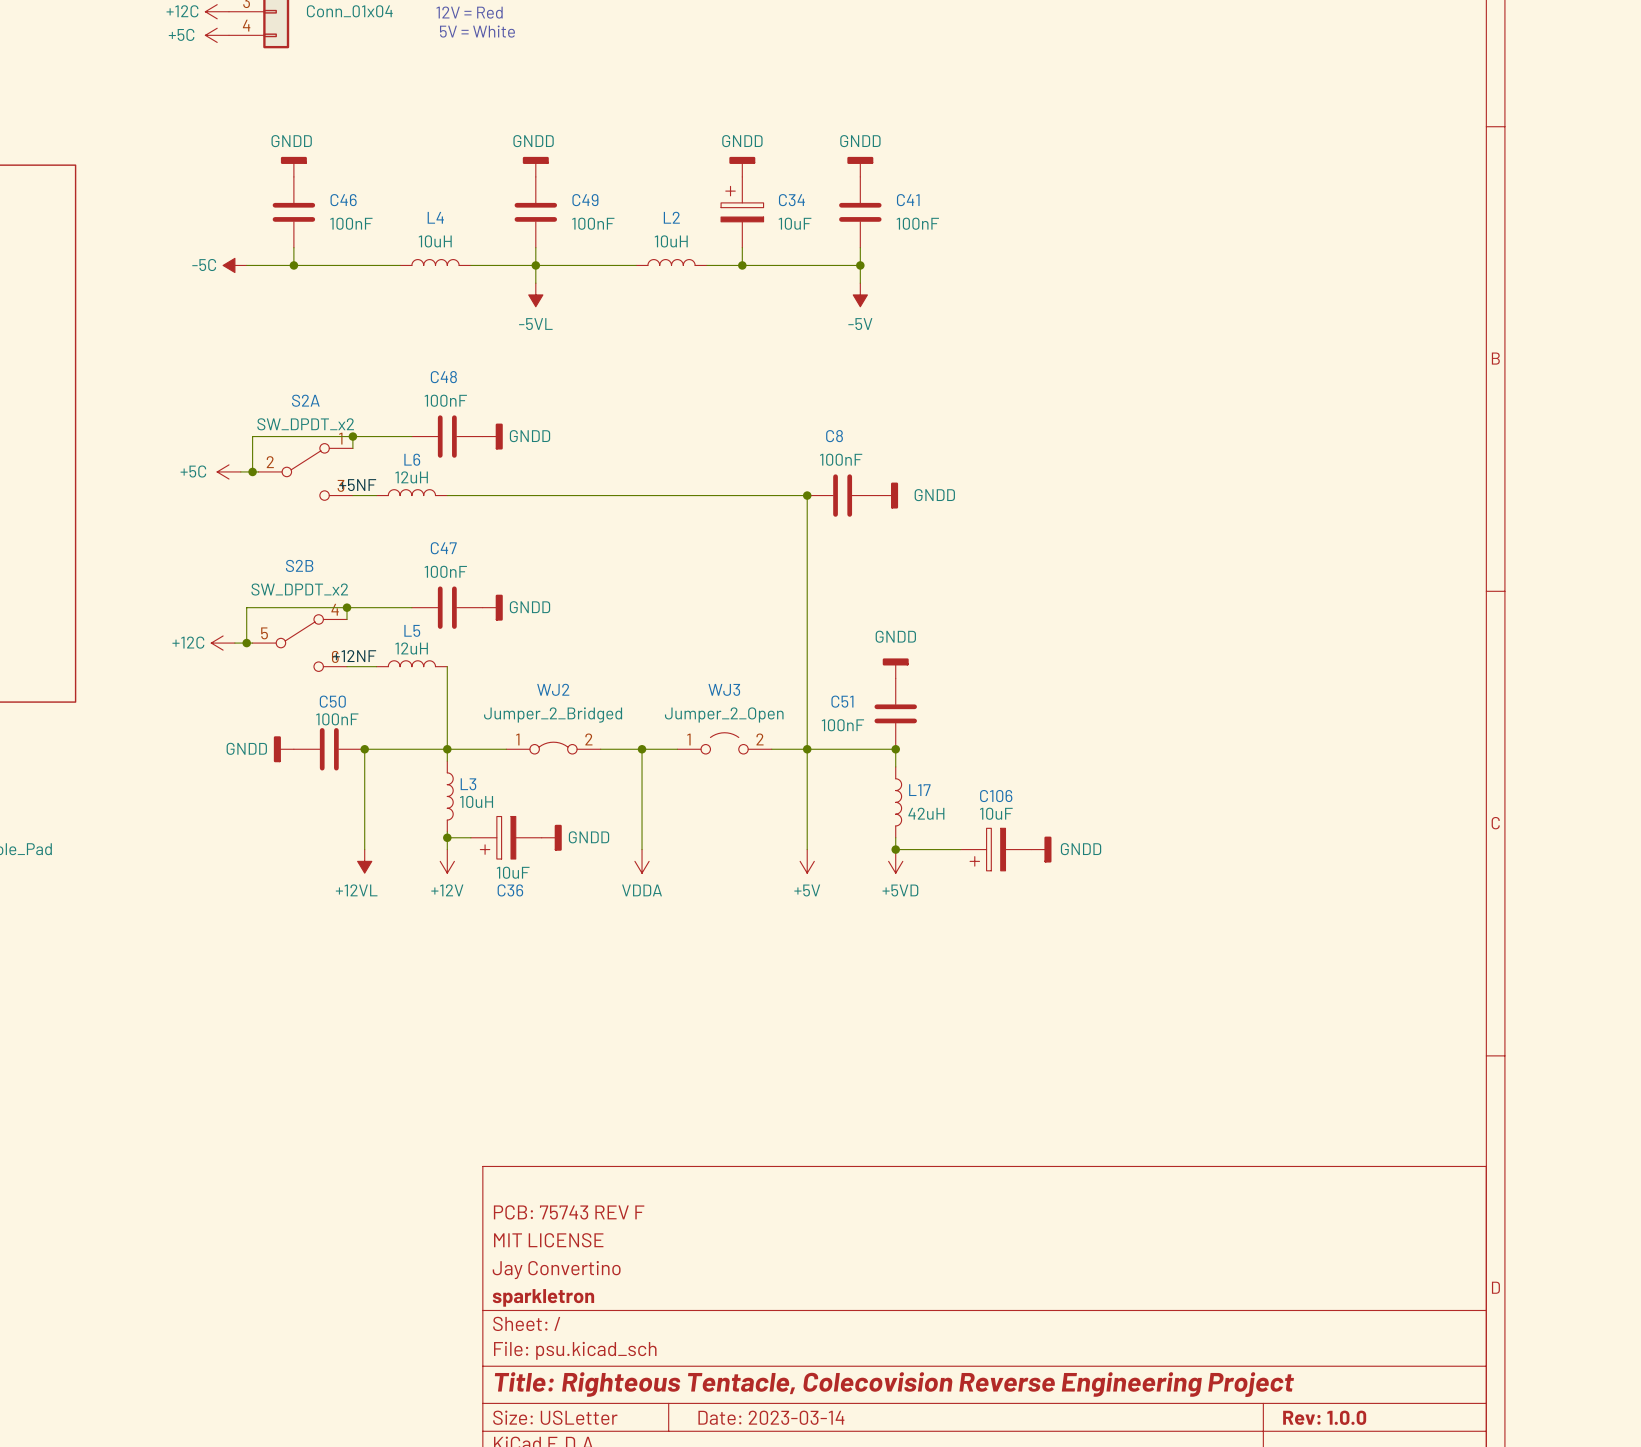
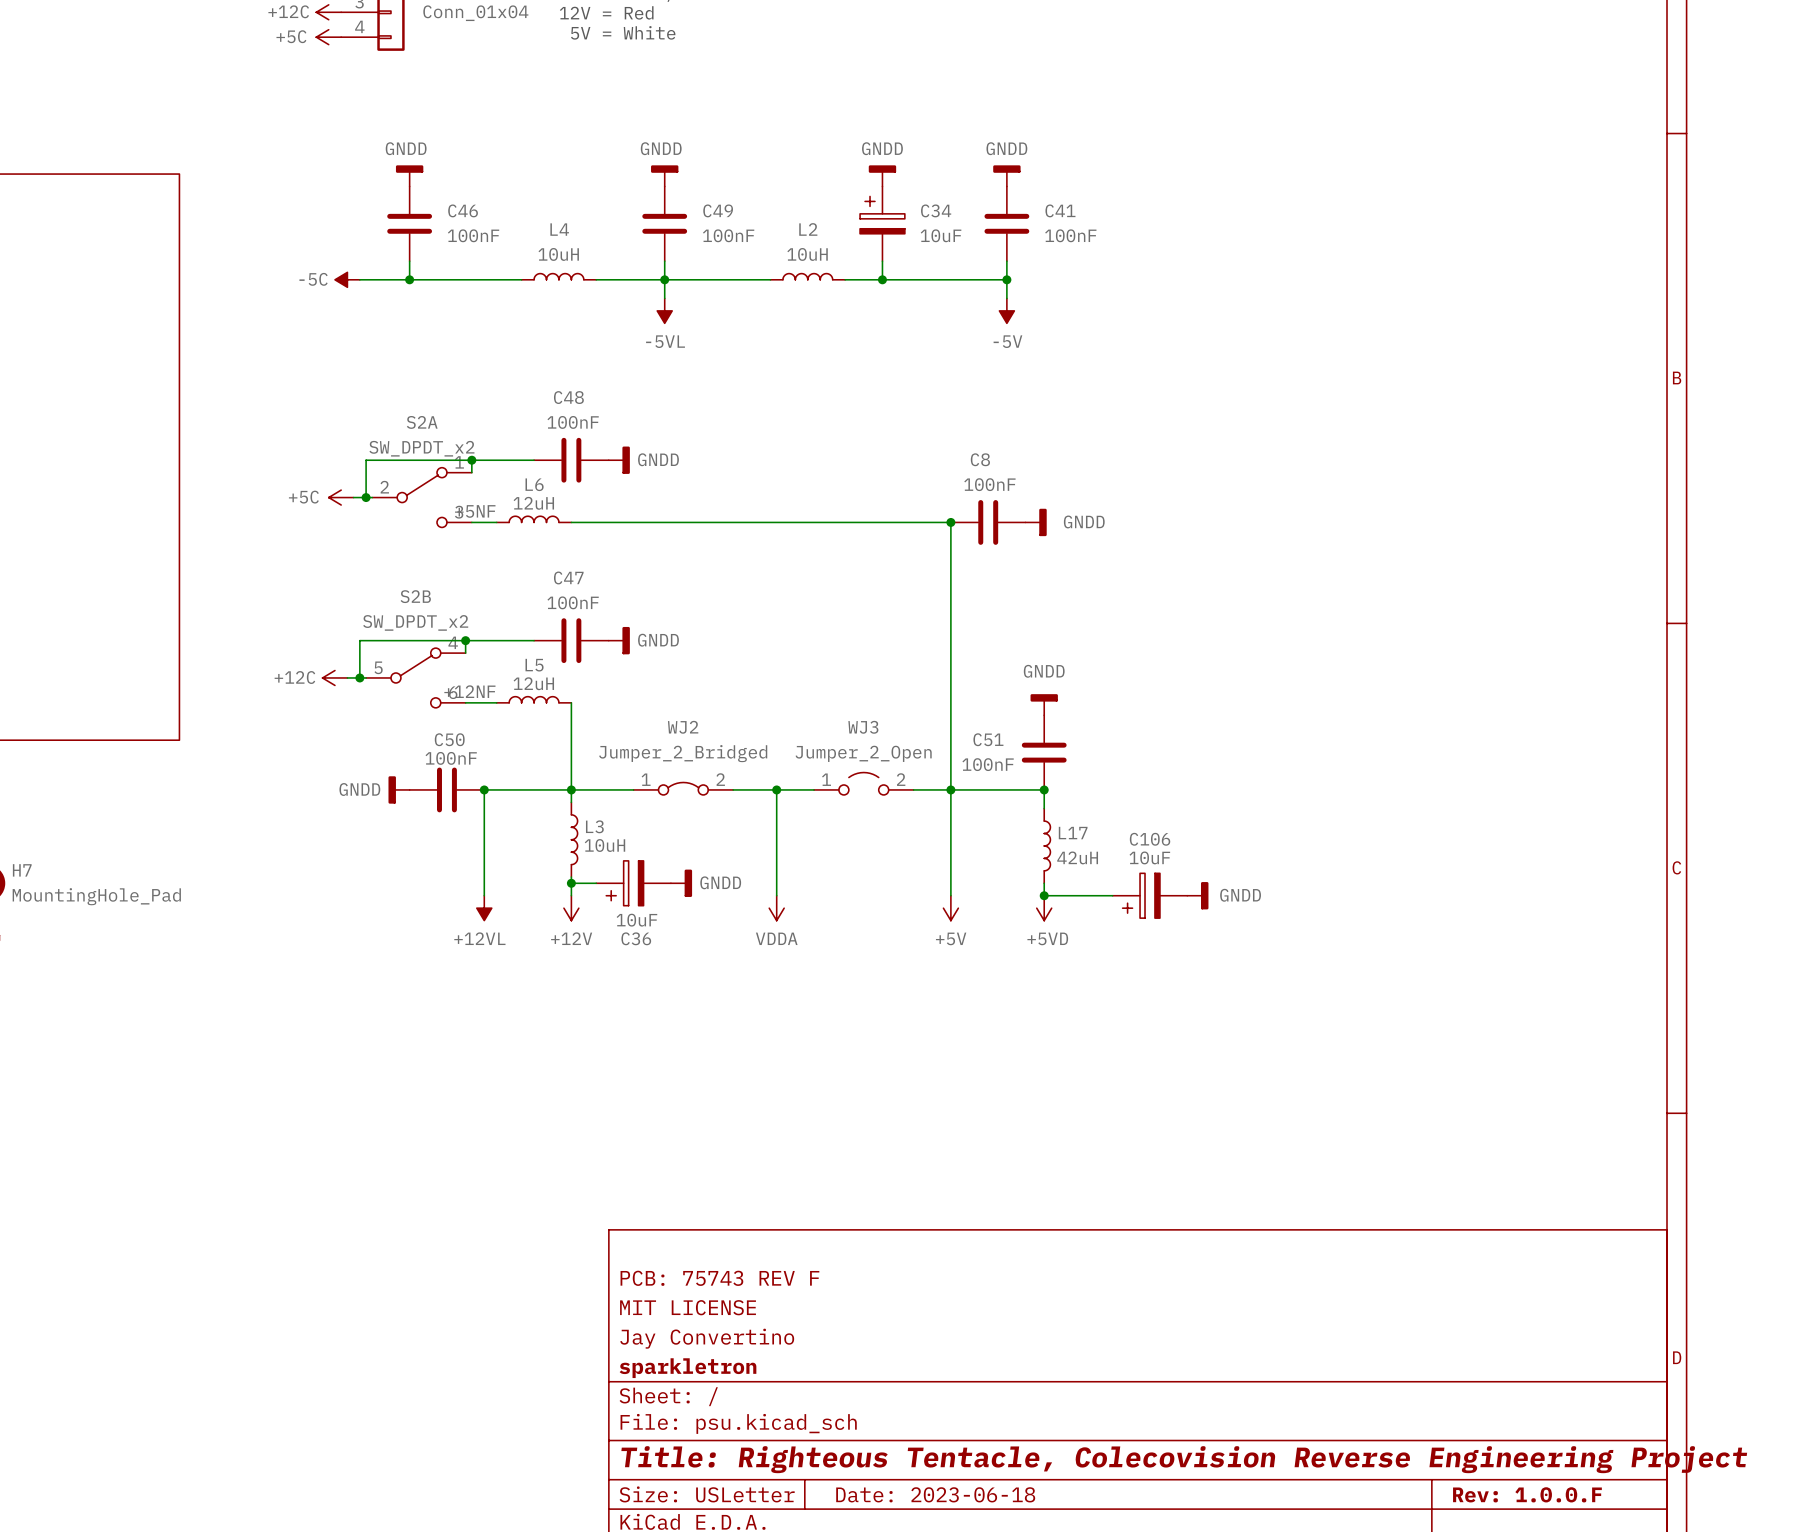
title block: Date: 2023-03-14 (771, 1417) -> Date: 2023-06-18 (935, 1494)
title block: Rev: 1.0.0 (1324, 1417) -> Rev: 1.0.0.F (1527, 1494)

